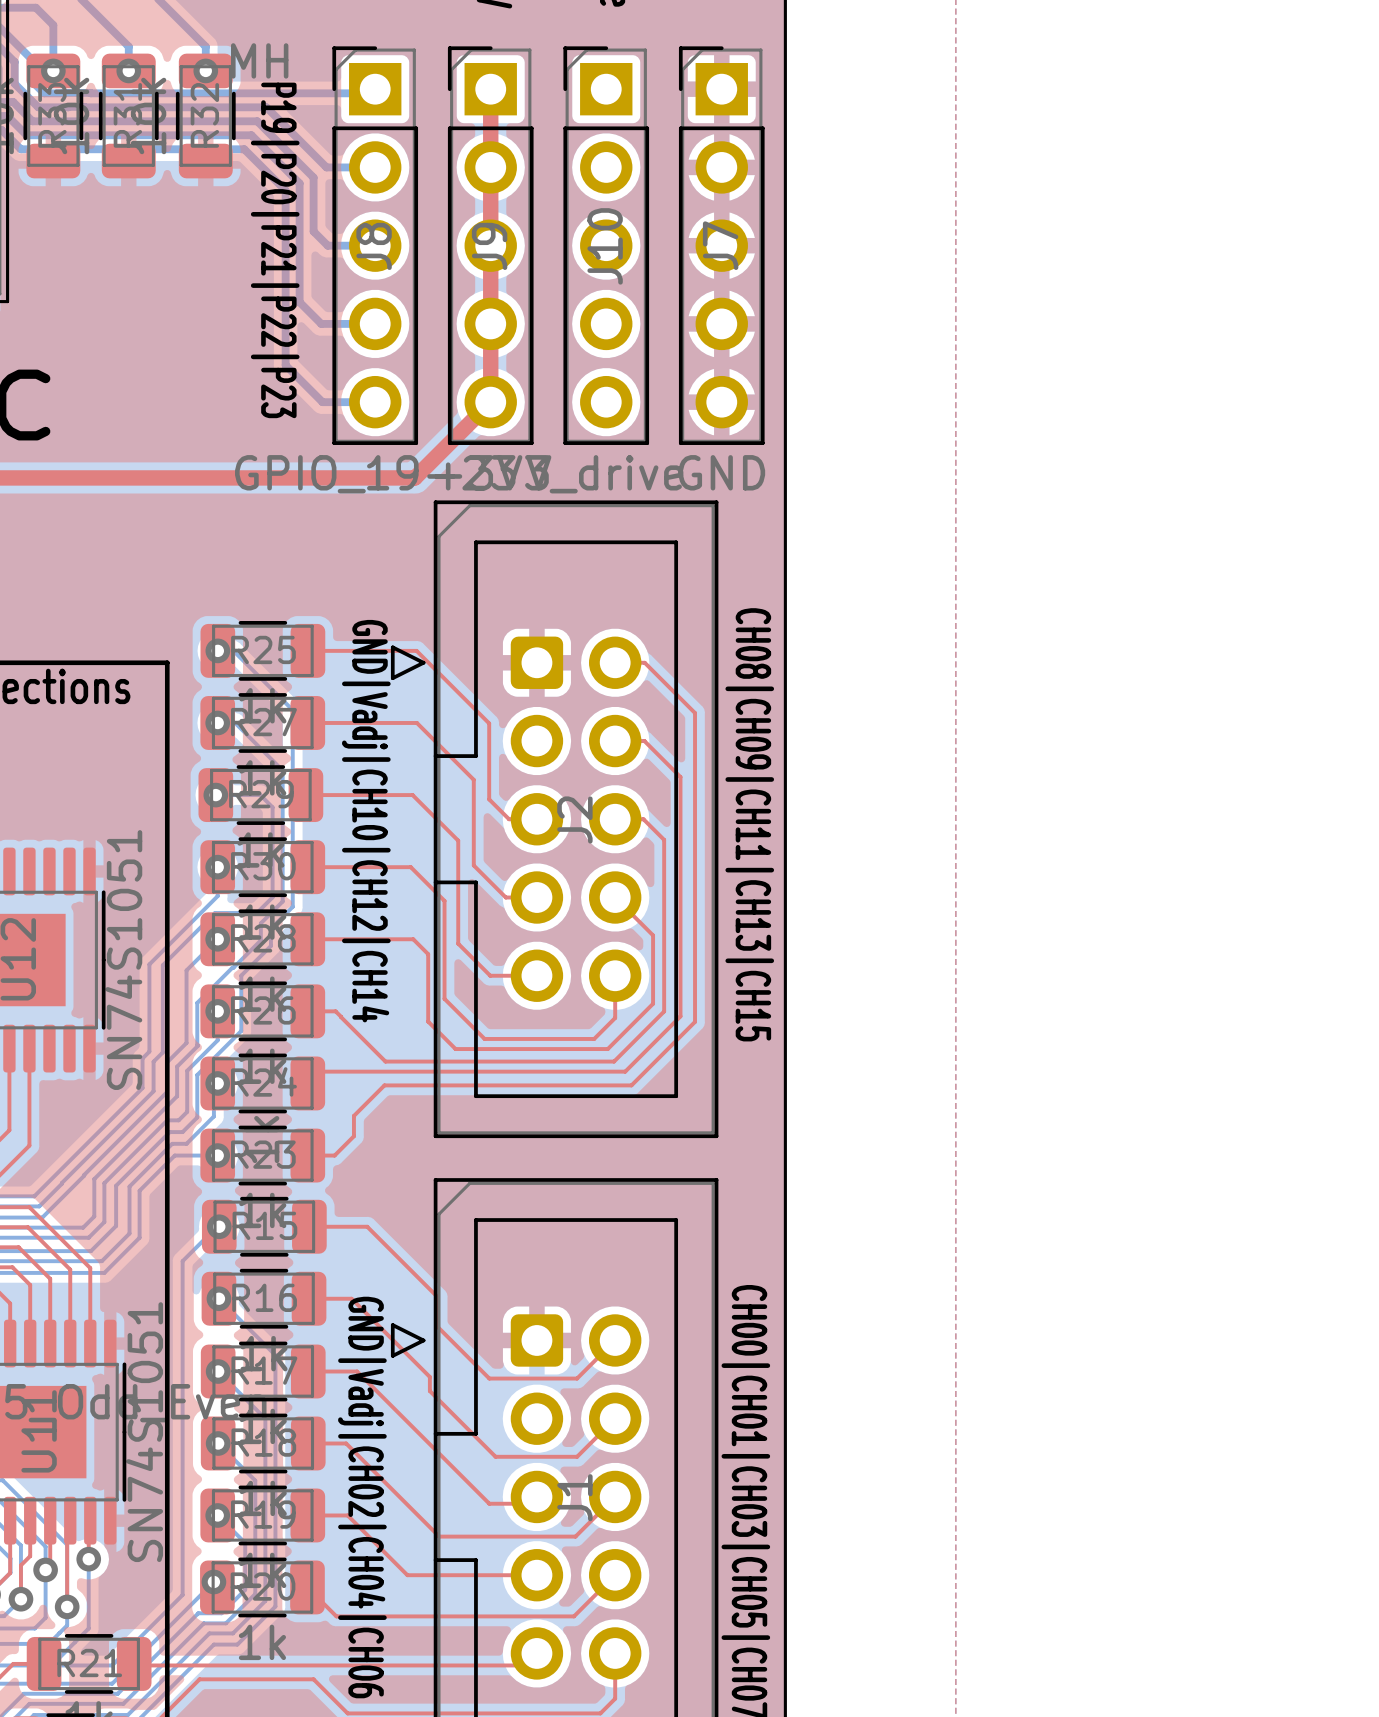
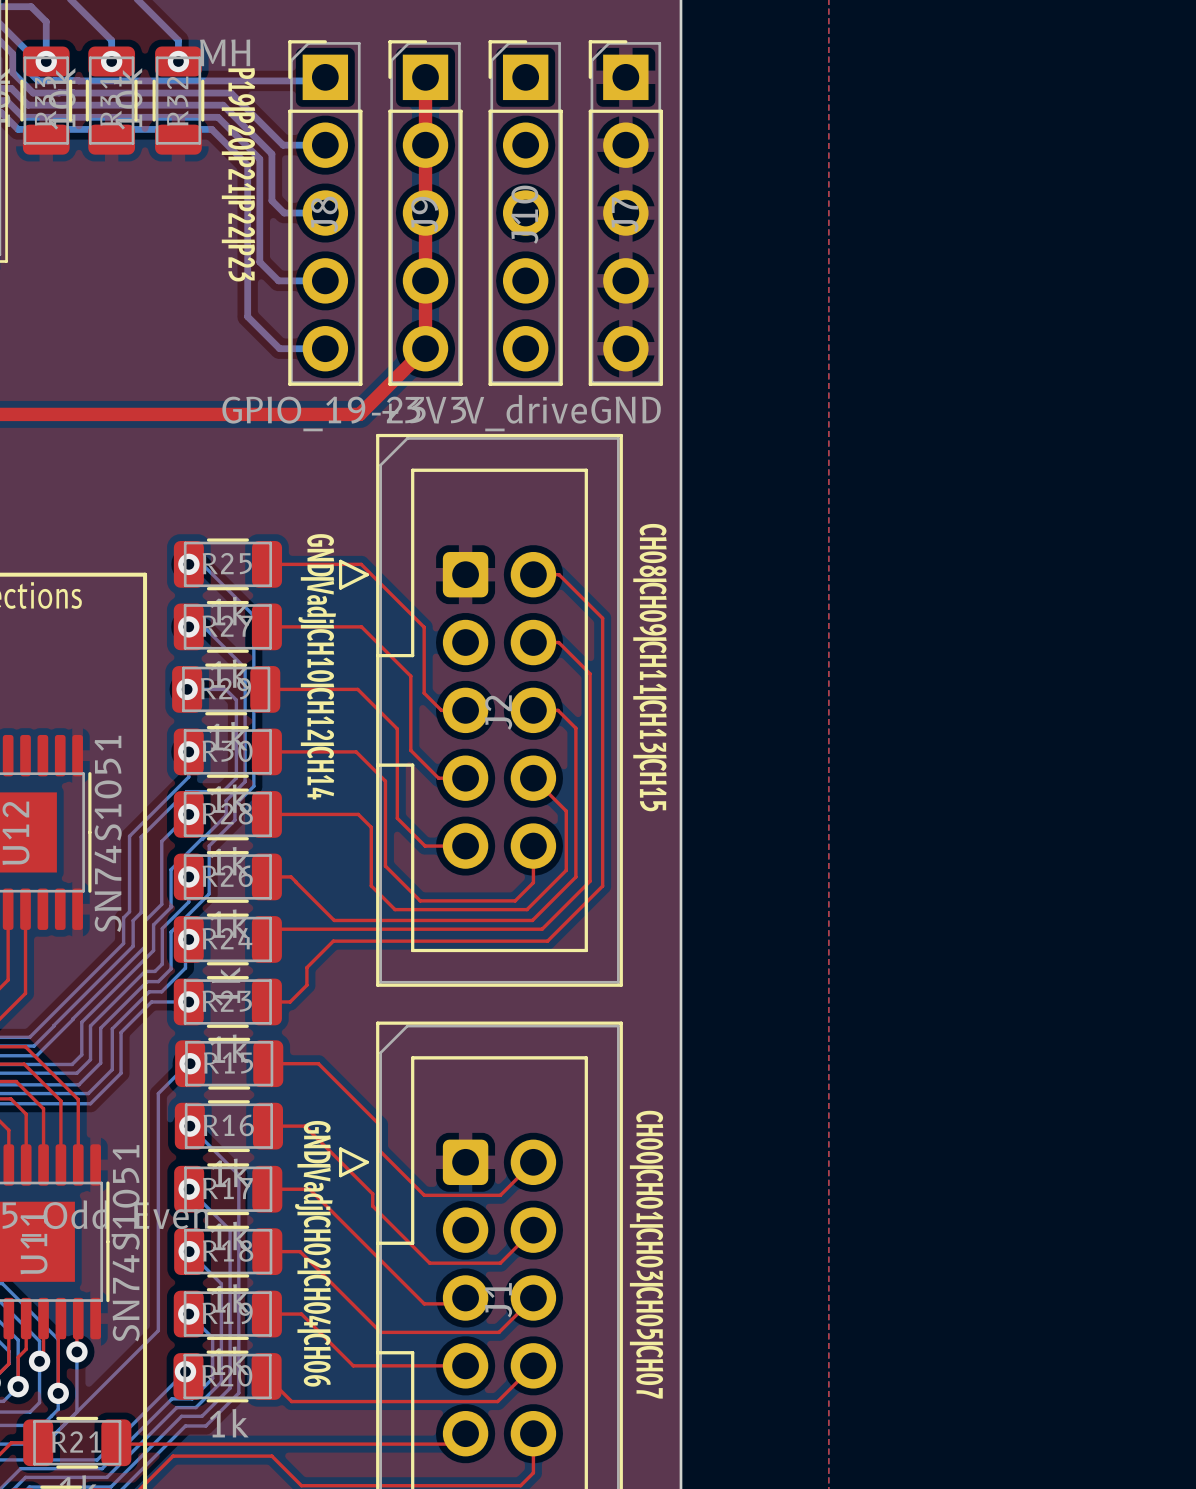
bottom track: (182, 1534) (182, 1594) (112, 1665) (51, 1665) -> (158, 1330) (76, 1412)

